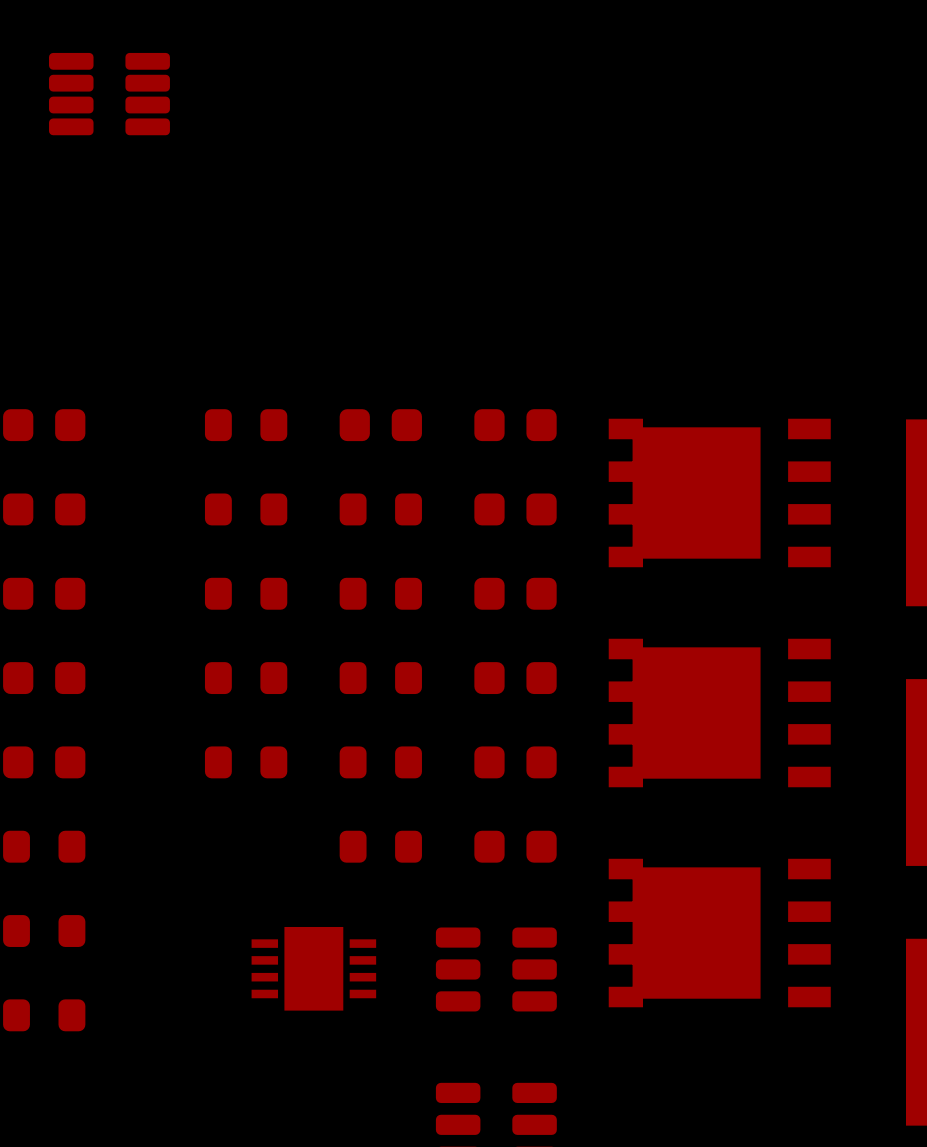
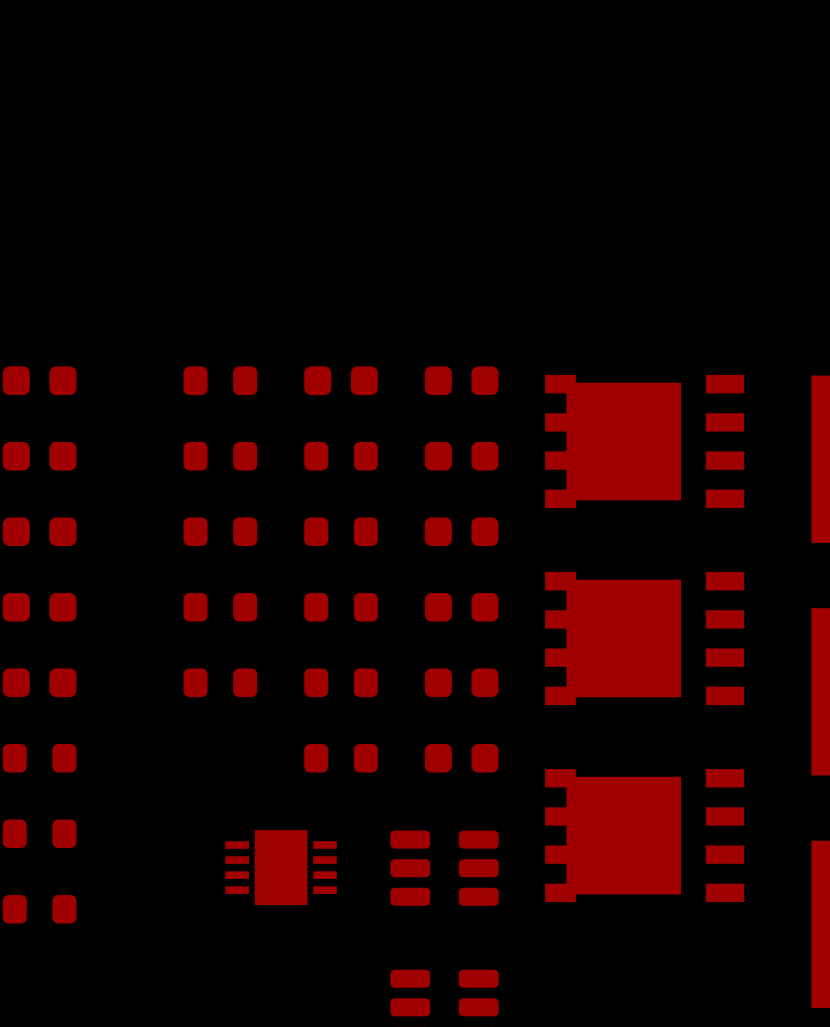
part: (109, 94) -> none

